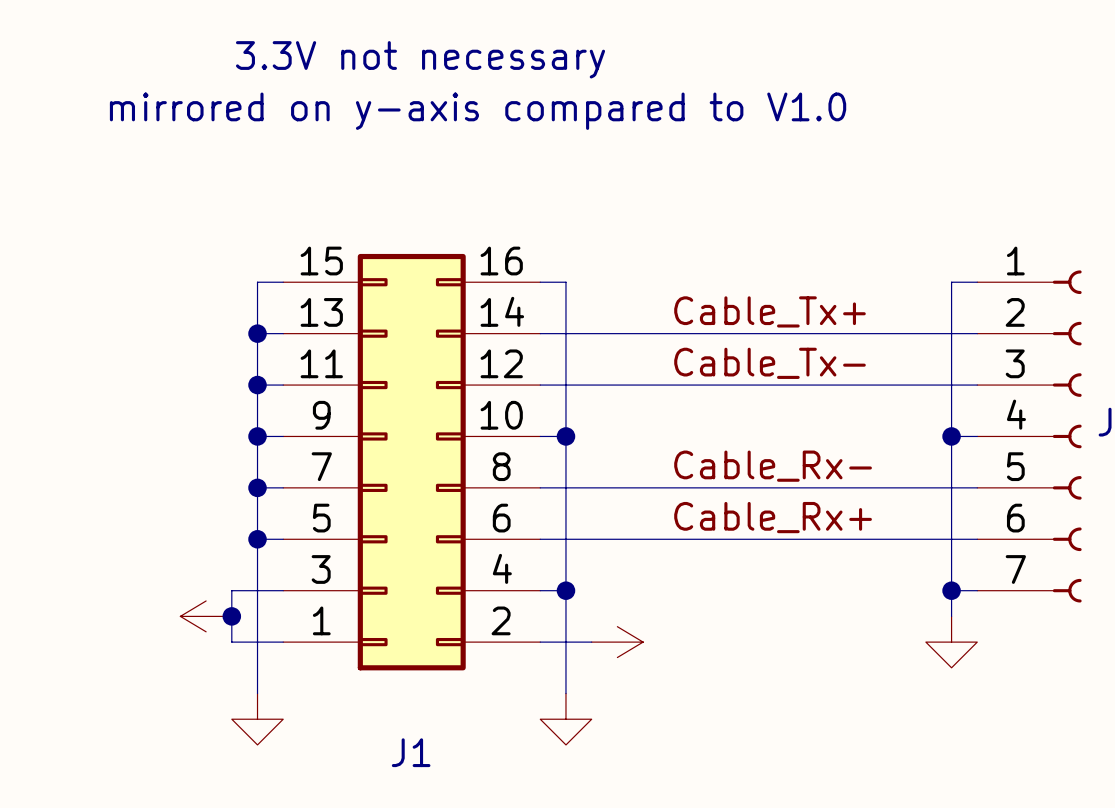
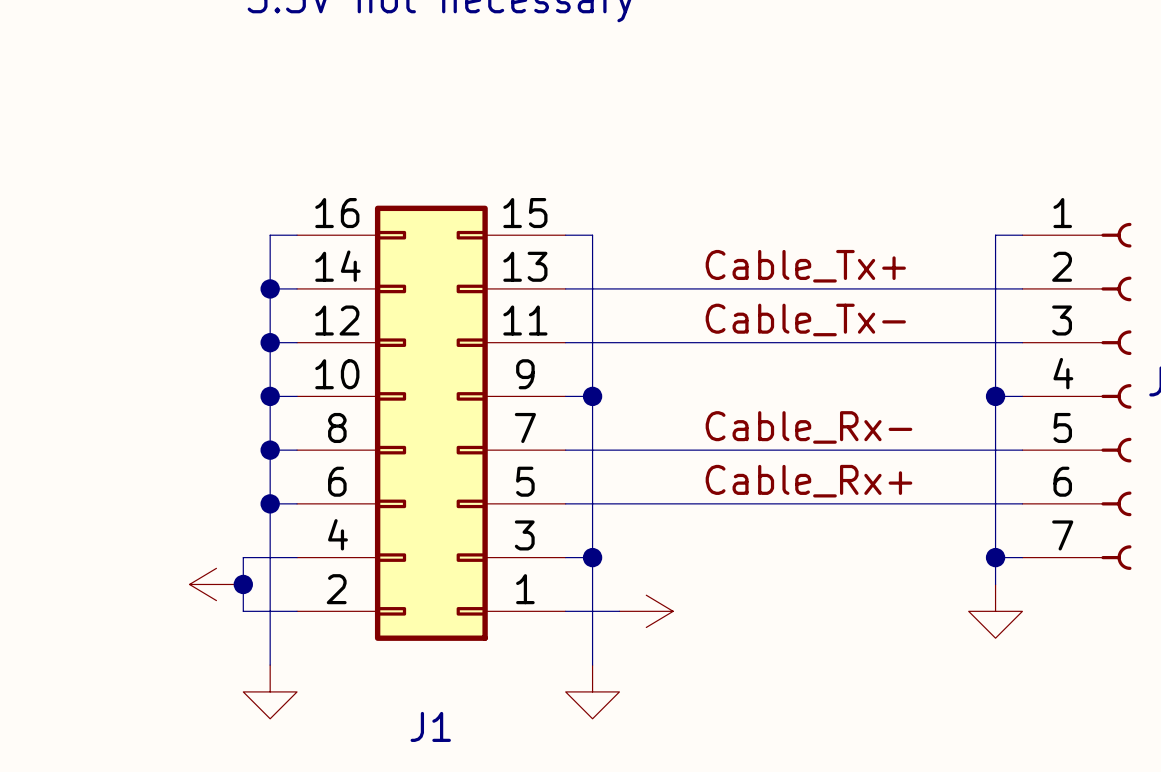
text: mirrored on y-axis compared to V1.0 (478, 111) -> none
J1 flip: as is (411, 462) -> left-right (431, 423)

